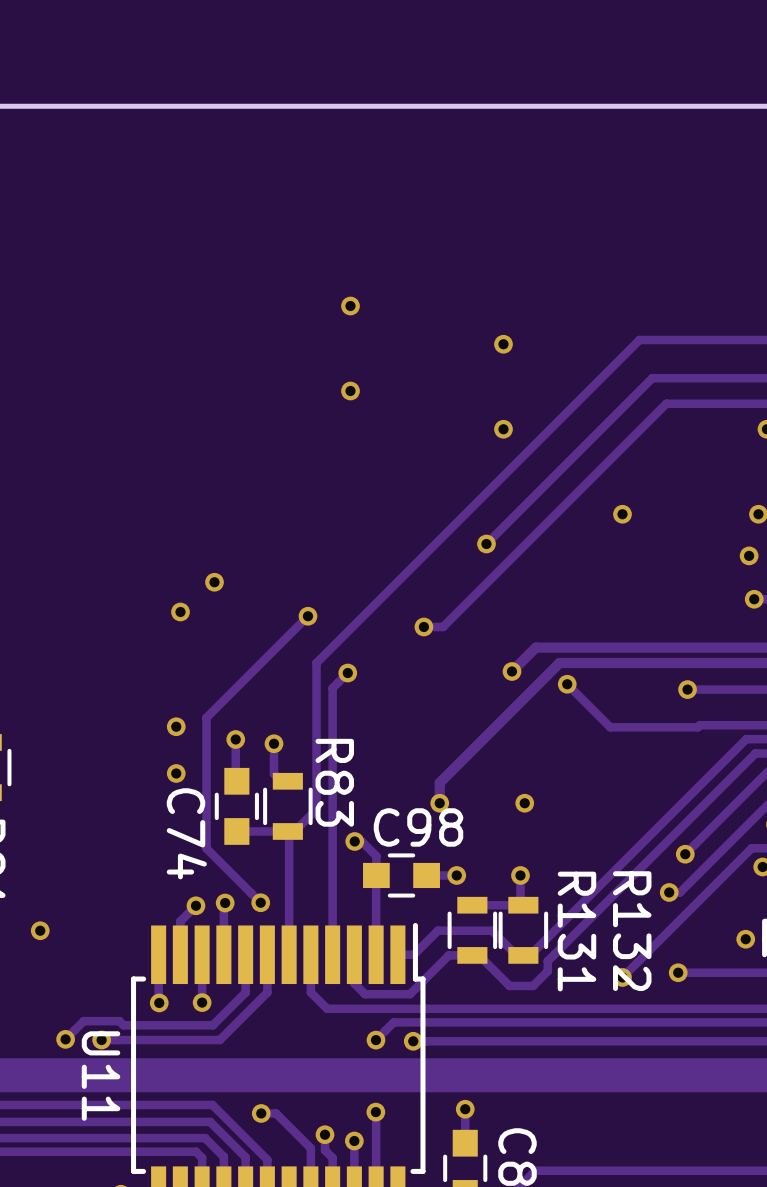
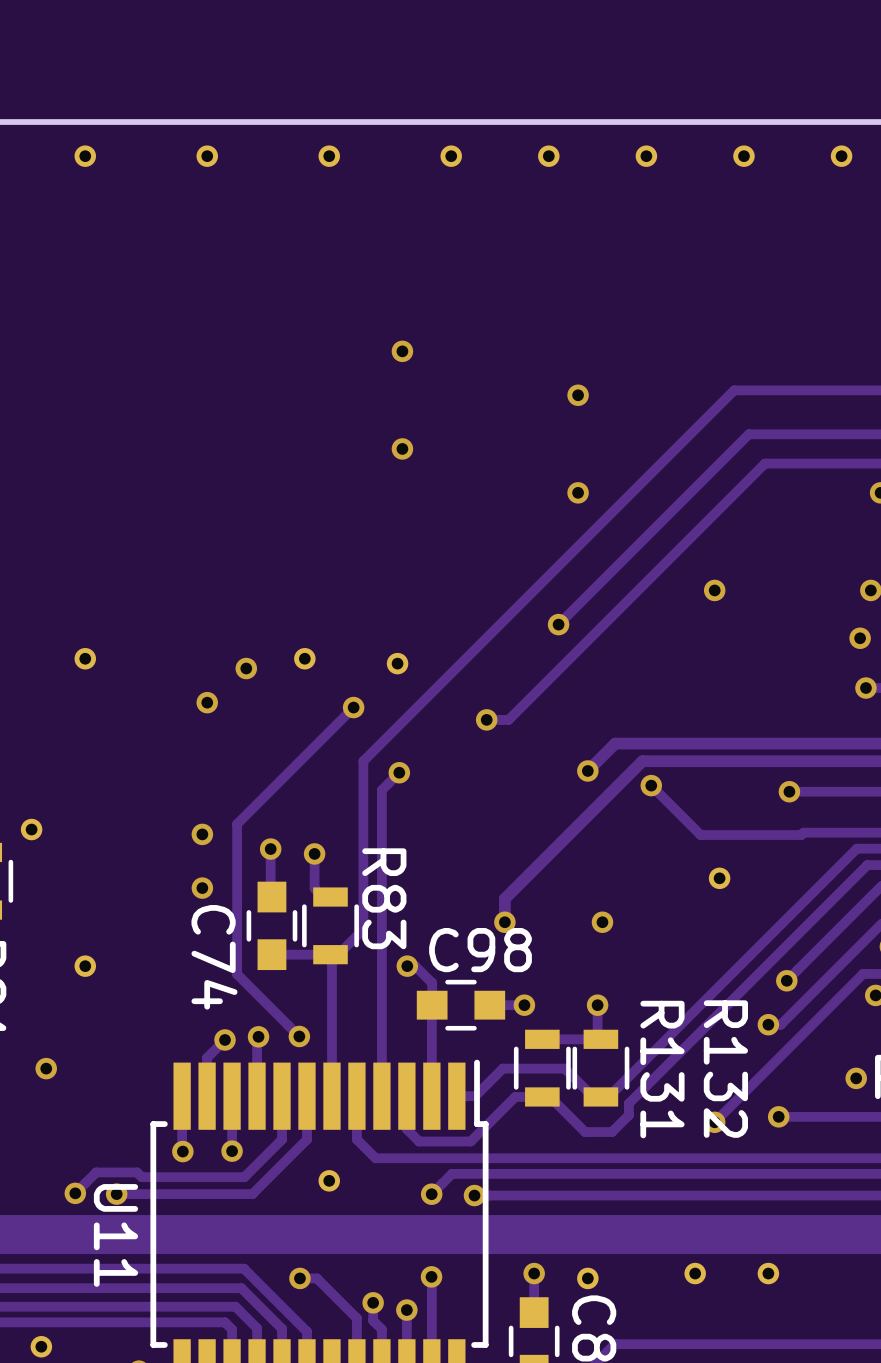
part: none -> (85, 156)
part: none -> (207, 156)
part: none -> (329, 156)
part: none -> (451, 156)
part: none -> (548, 156)
part: none -> (646, 156)
part: none -> (743, 156)
part: none -> (841, 156)
part: none -> (85, 658)
part: none -> (304, 658)
part: none -> (397, 663)
part: none -> (31, 829)
part: none -> (719, 878)
part: none -> (85, 966)
part: none -> (329, 1180)
part: none -> (695, 1273)
part: none -> (768, 1273)
part: none -> (587, 1278)
part: none -> (41, 1346)

